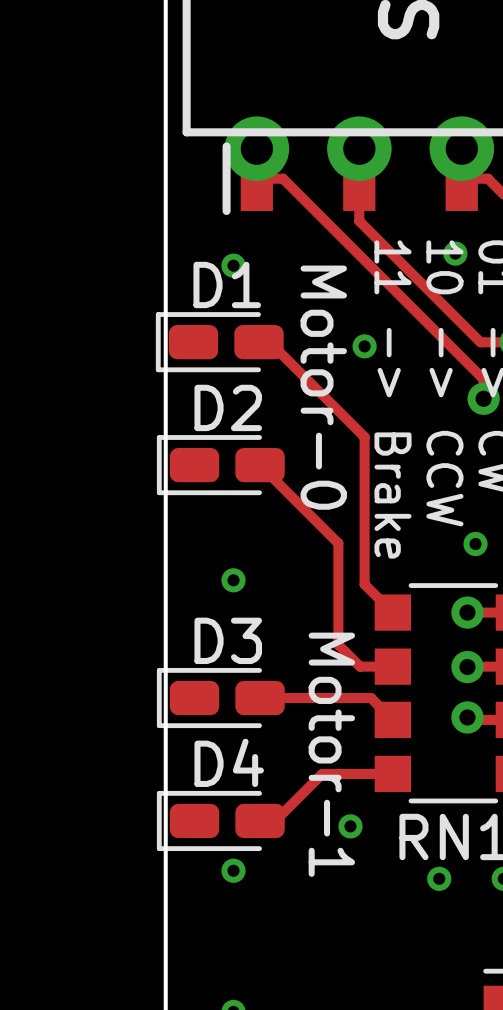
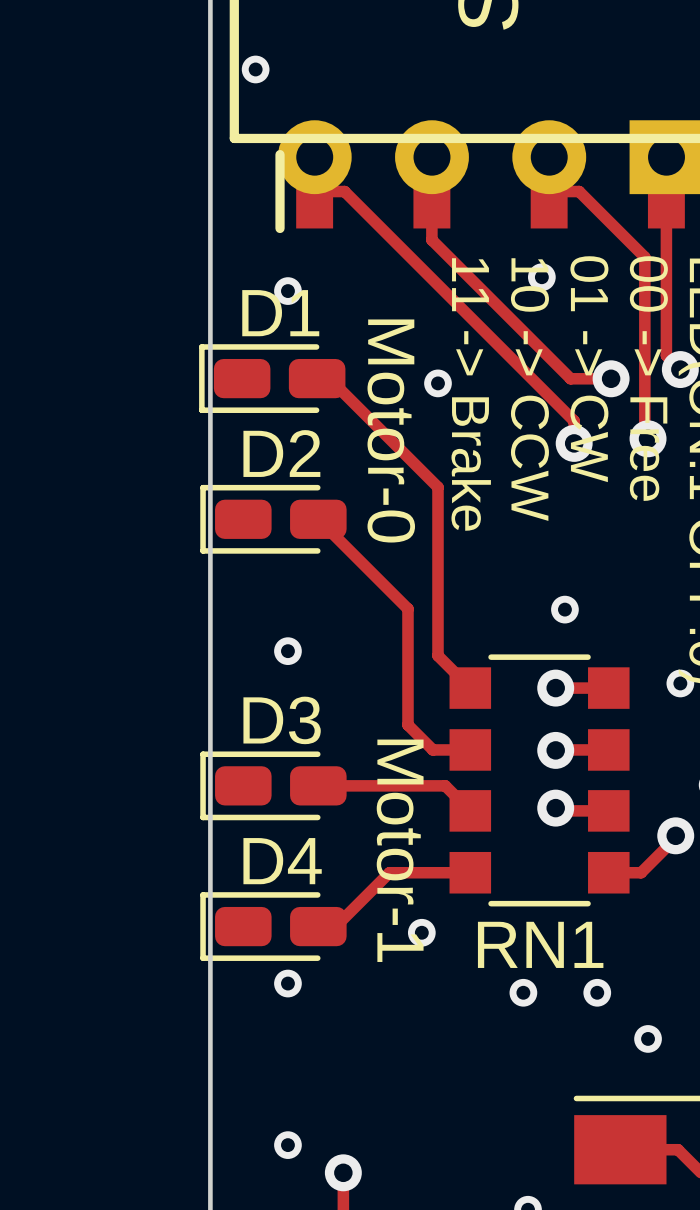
via: none -> (255, 69)

